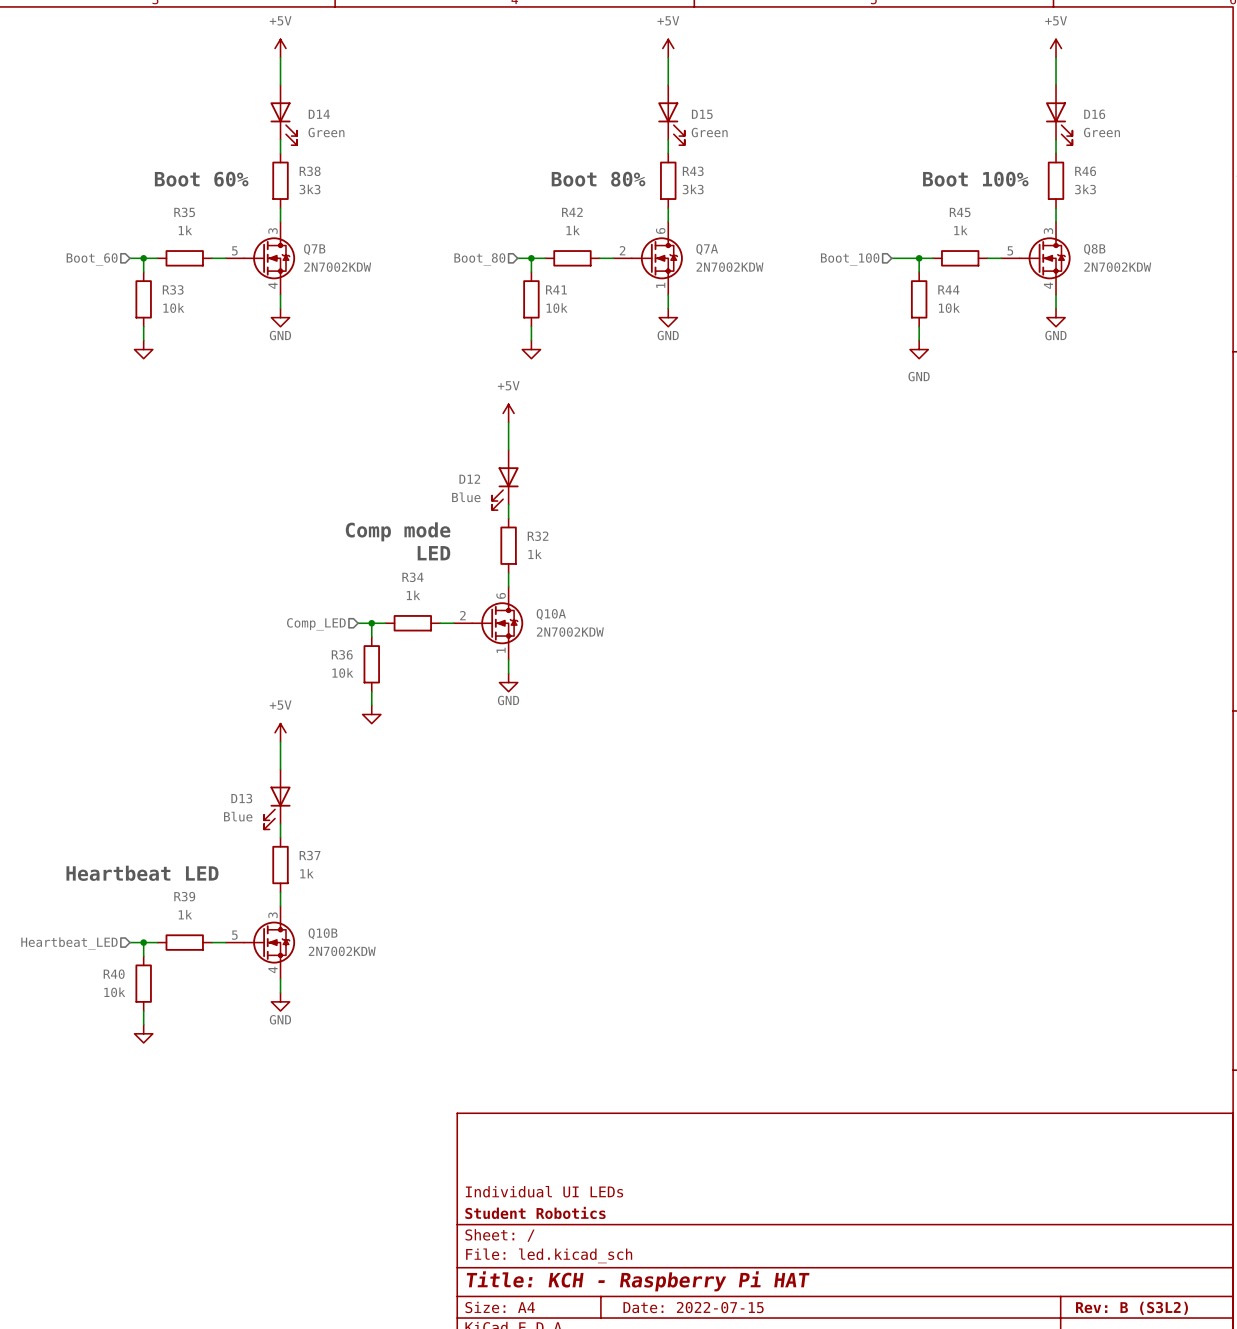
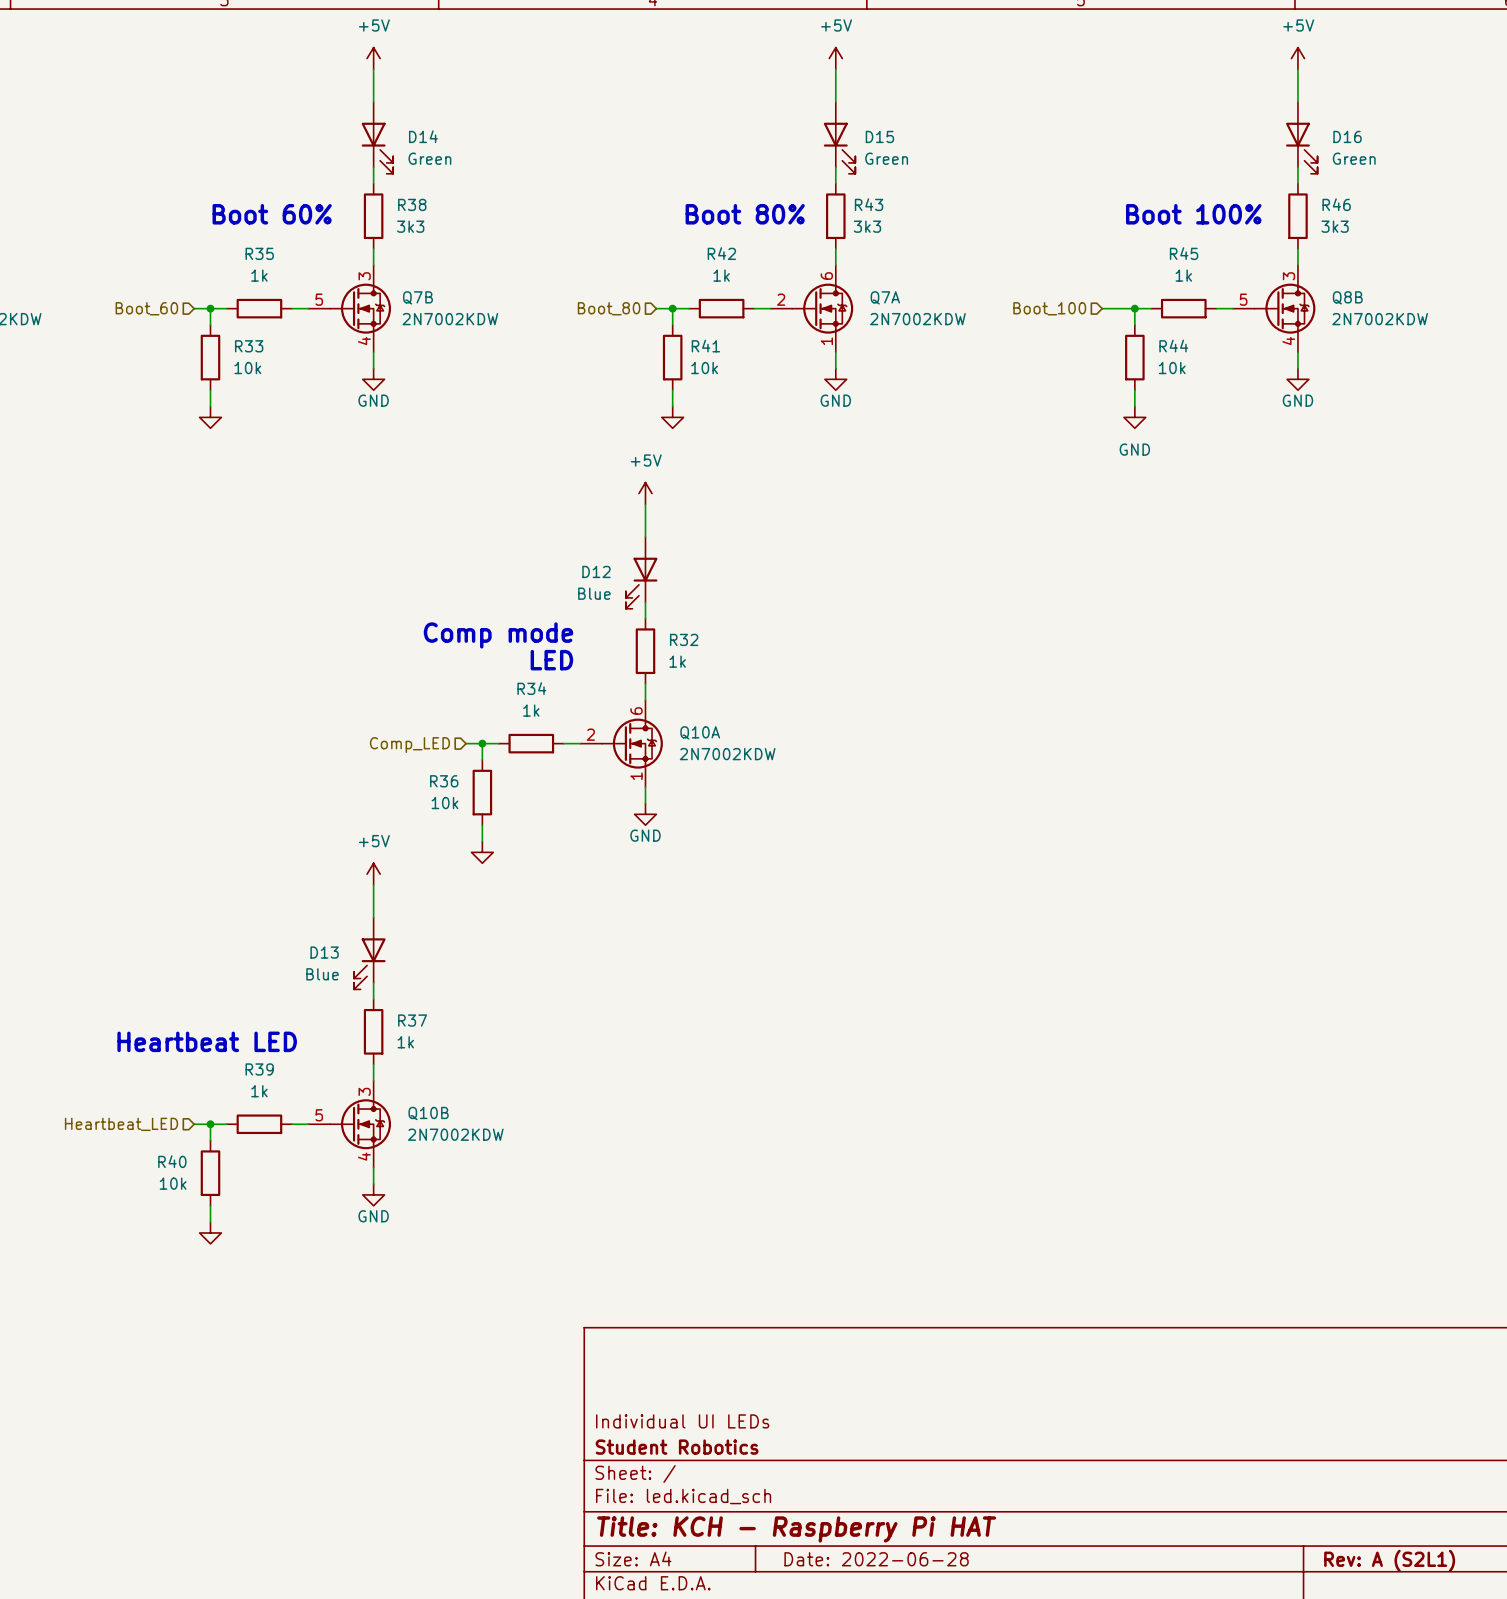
title block: Date: 2022-07-15 (693, 1307) -> Date: 2022-06-28 (876, 1559)
title block: Rev: B (S3L2) (1131, 1308) -> Rev: A (S2L1) (1389, 1560)

